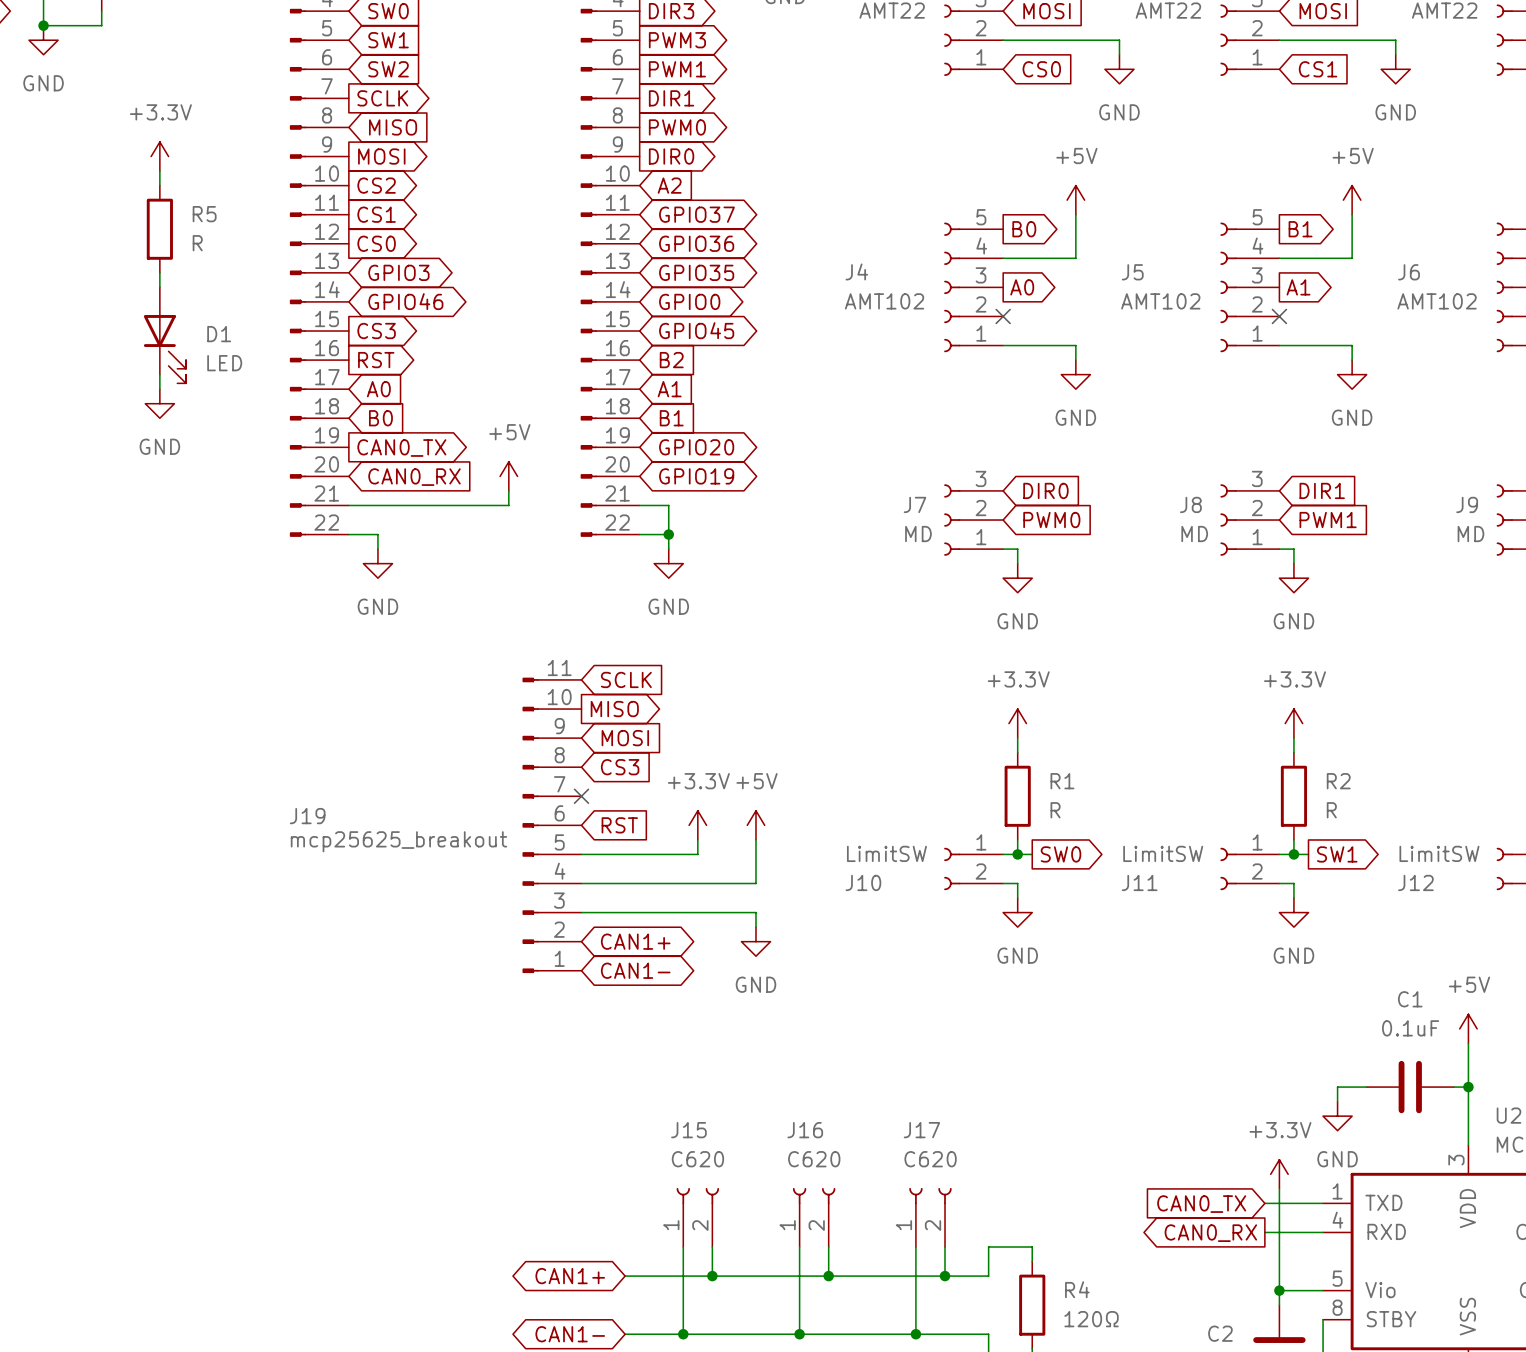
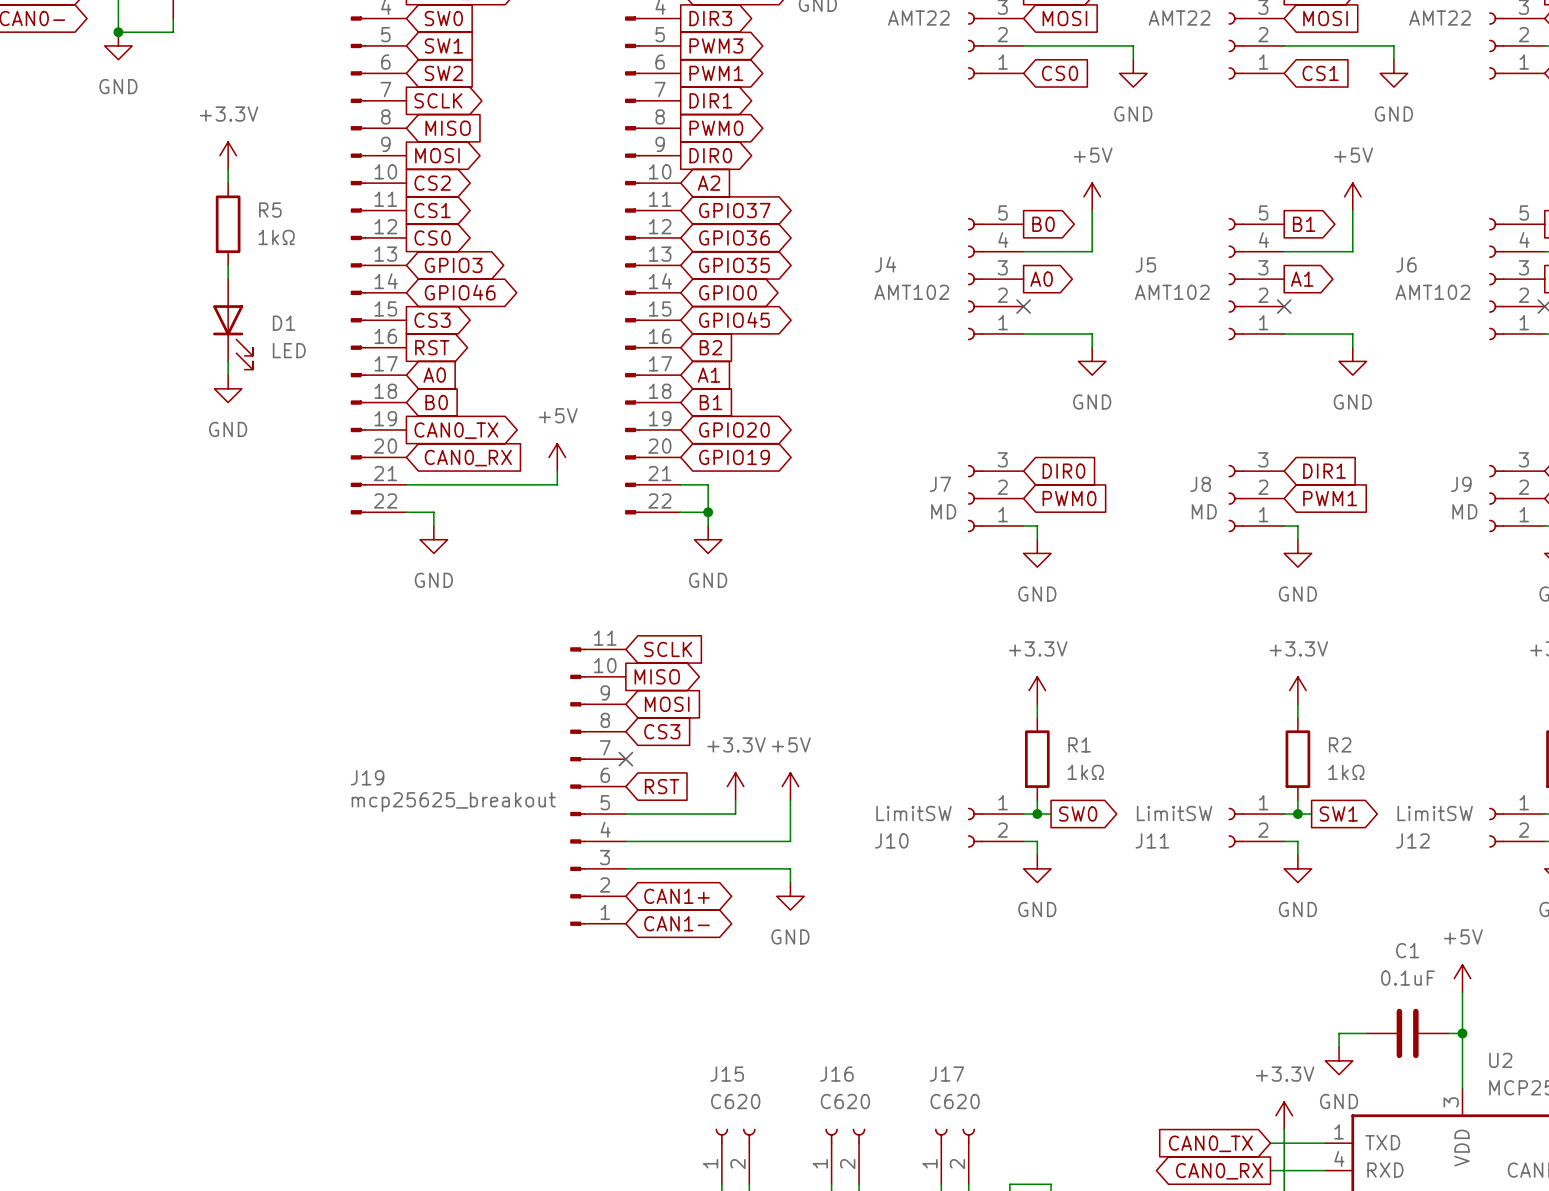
R5 value: R (197, 243) -> 1kΩ (276, 237)
R1 value: R (1055, 810) -> 1kΩ (1085, 772)
R2 value: R (1331, 810) -> 1kΩ (1346, 772)

